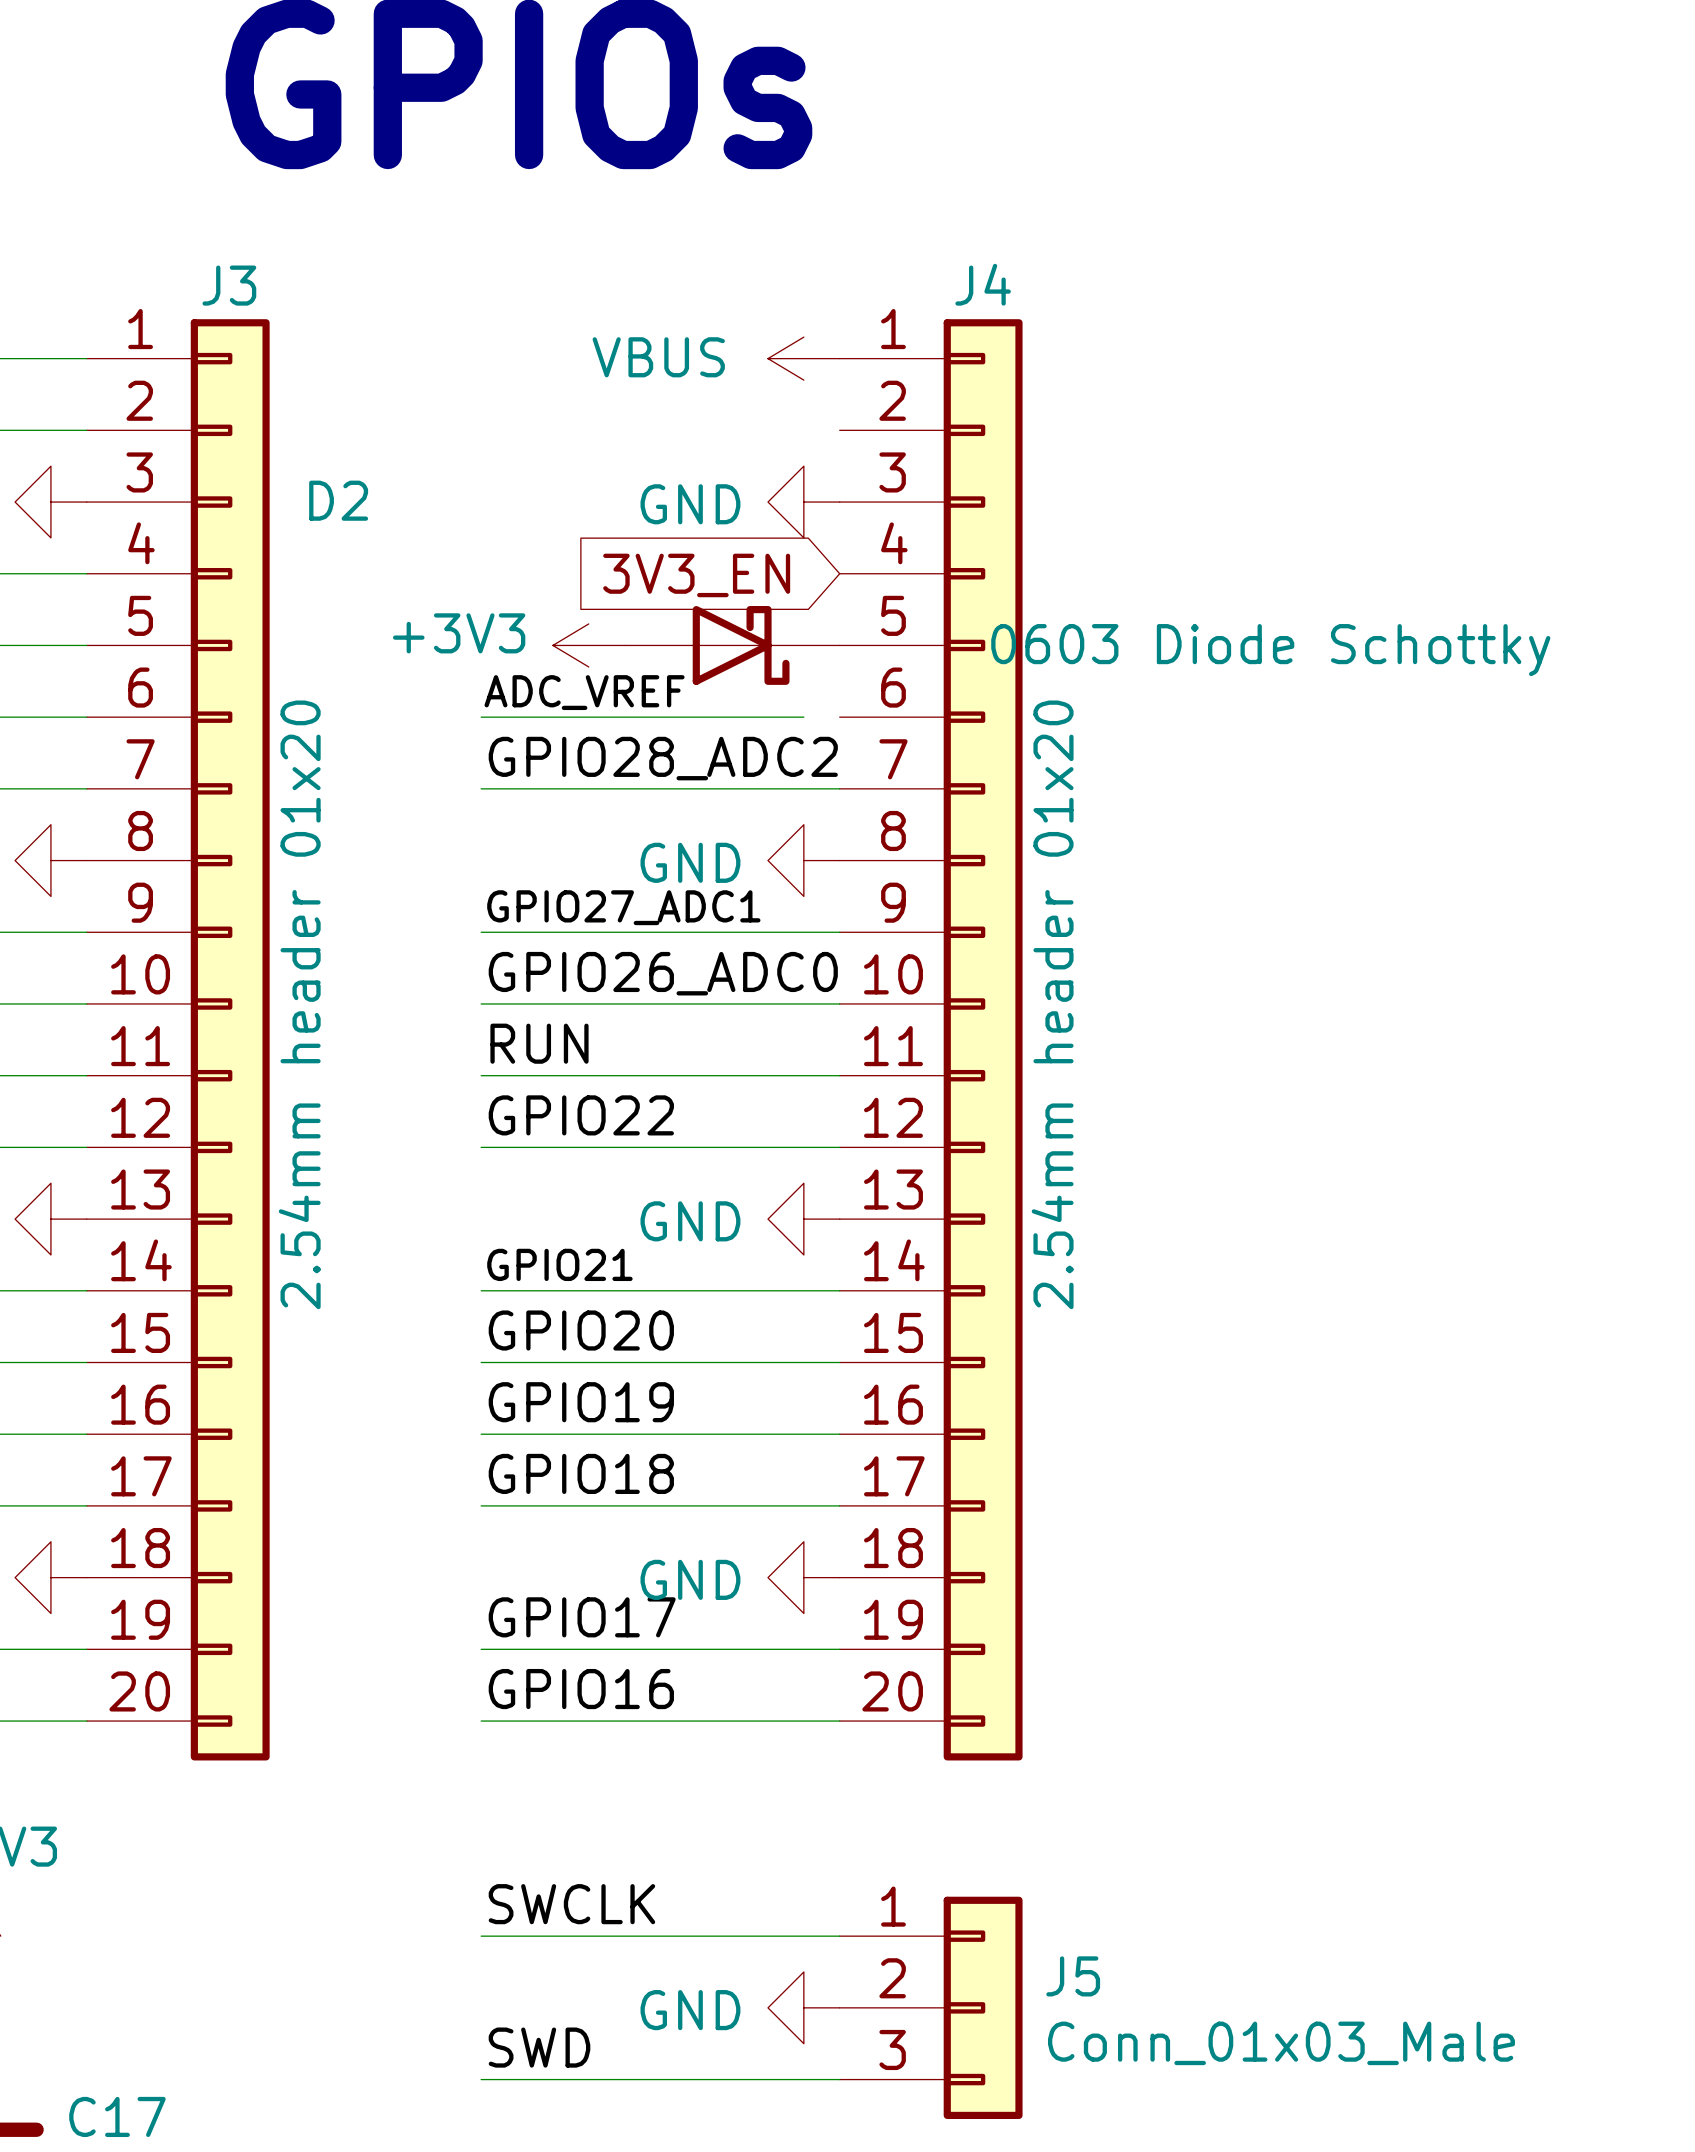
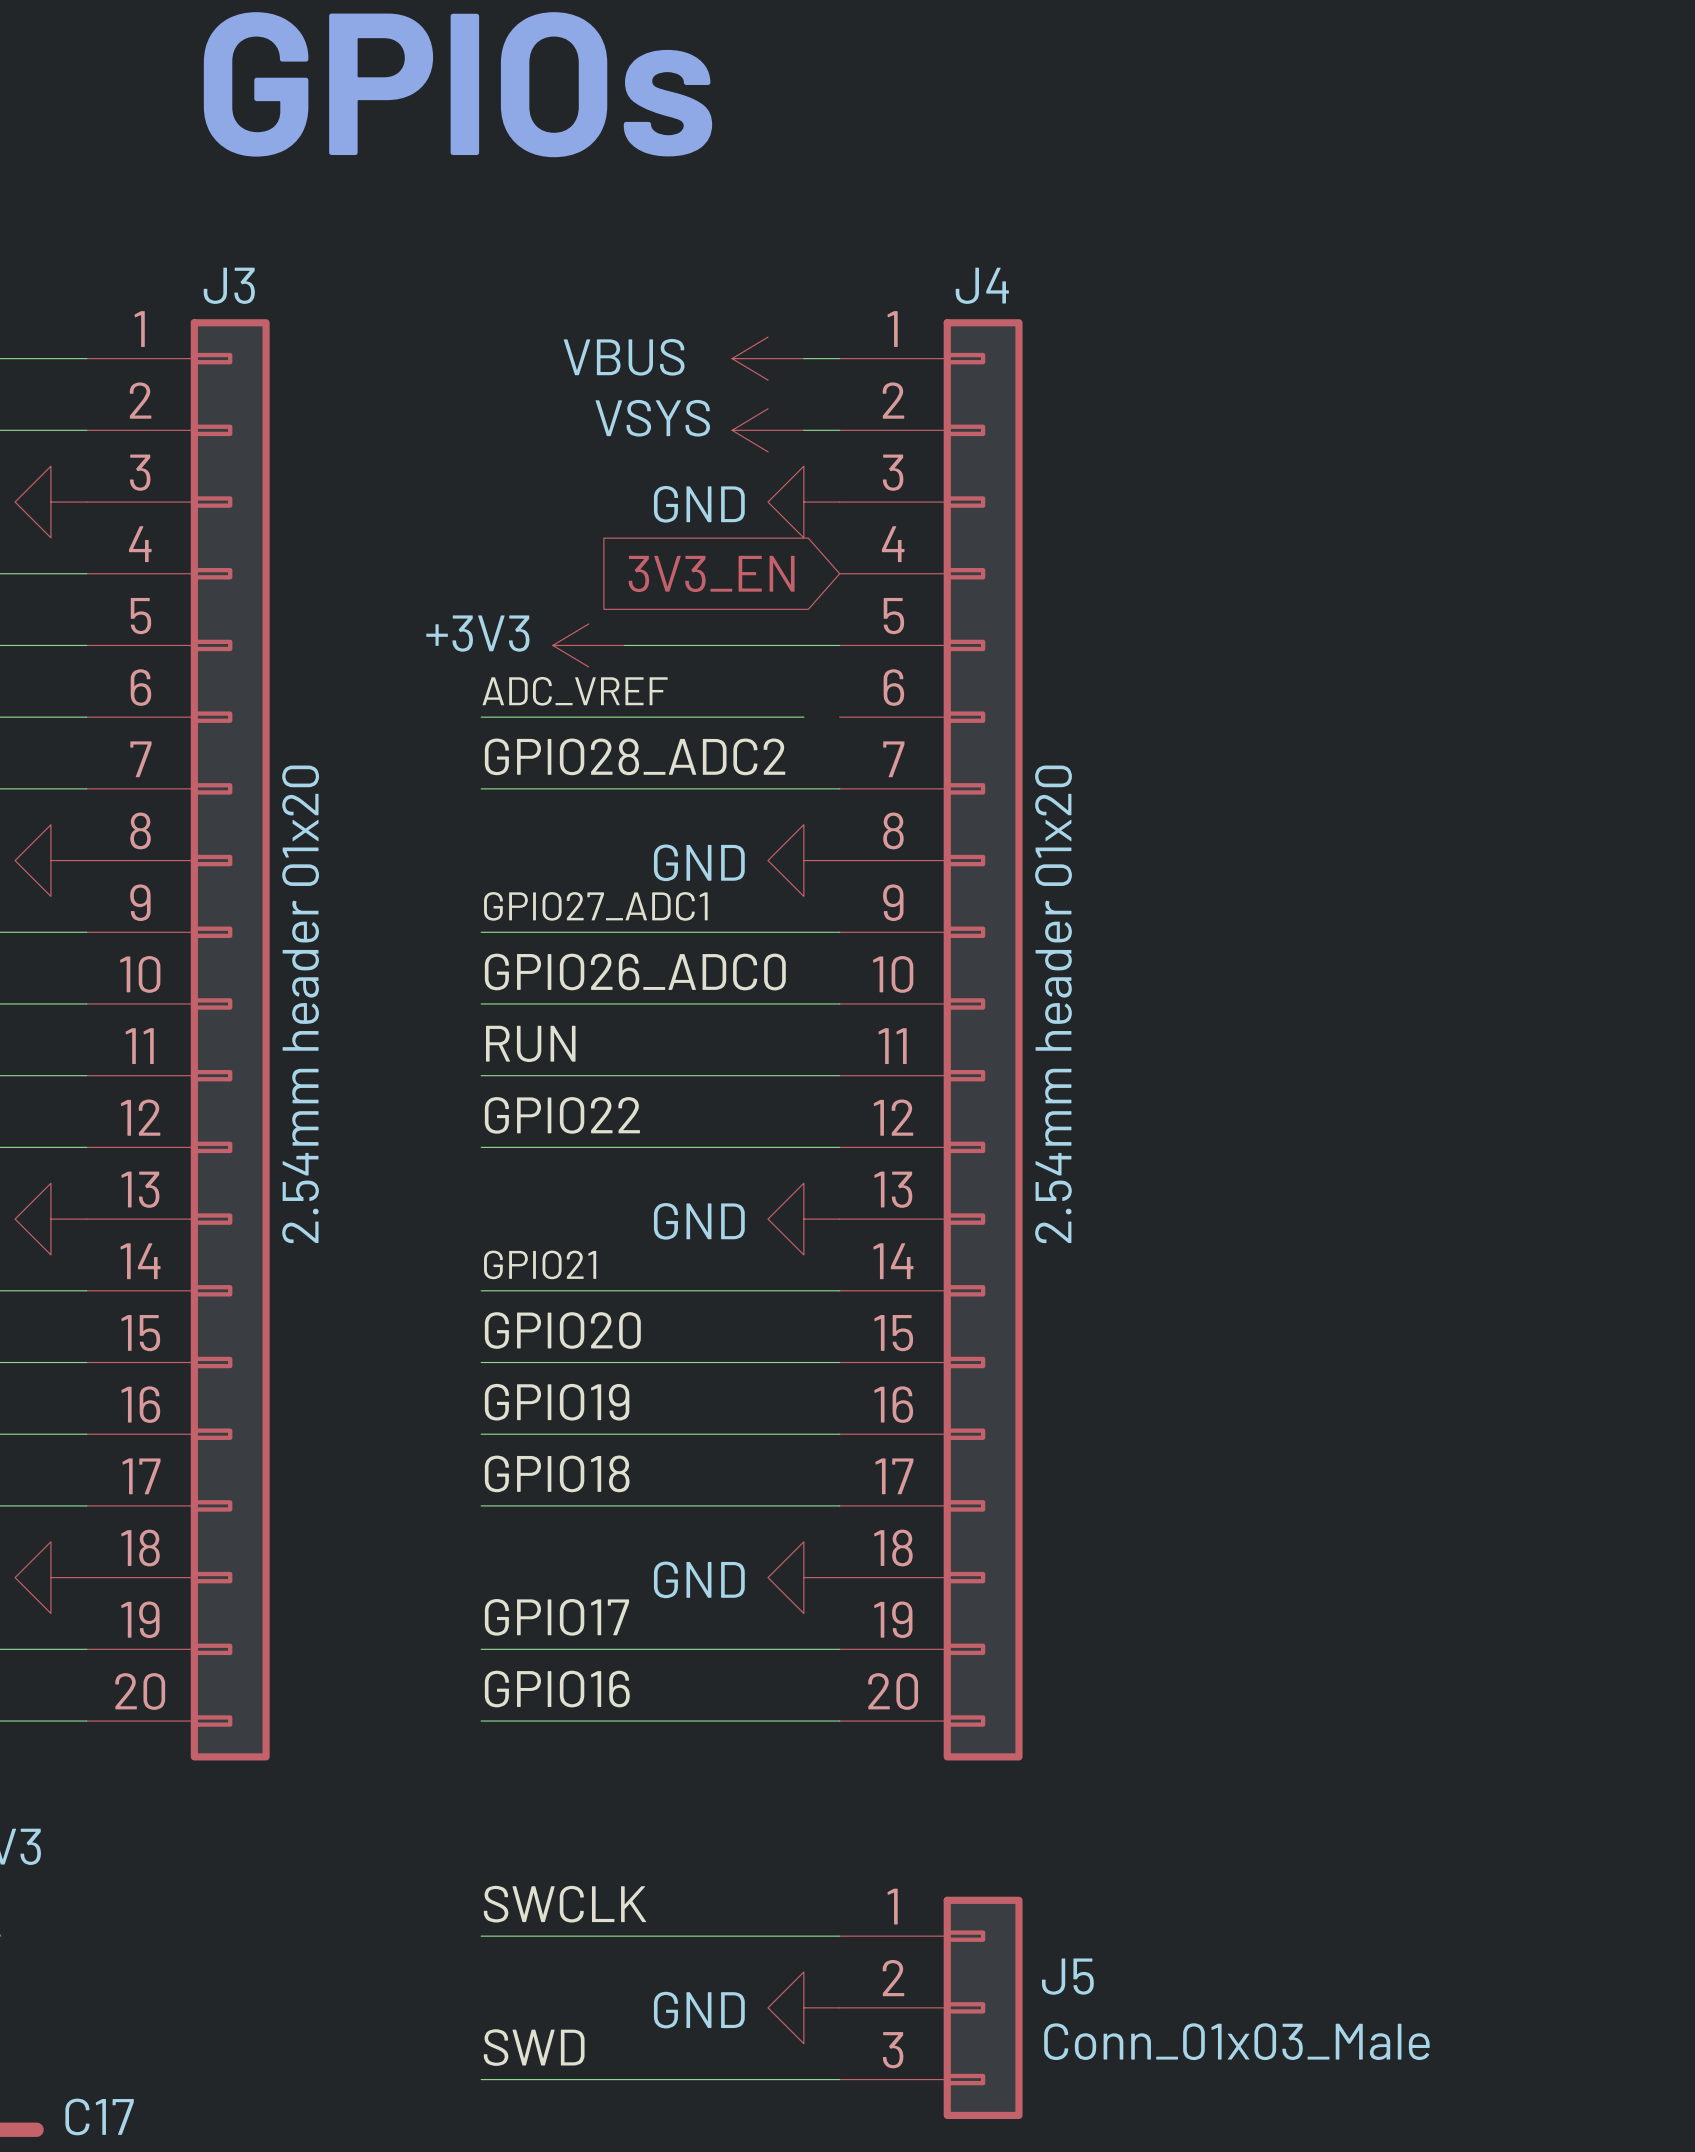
power symbol position: VBUS (803, 358) -> VBUS (768, 358)
power symbol: none -> VSYS (768, 430)
wire: none -> (803, 430) (839, 430)
D2: 0603 Diode Schottky (732, 645) -> none

